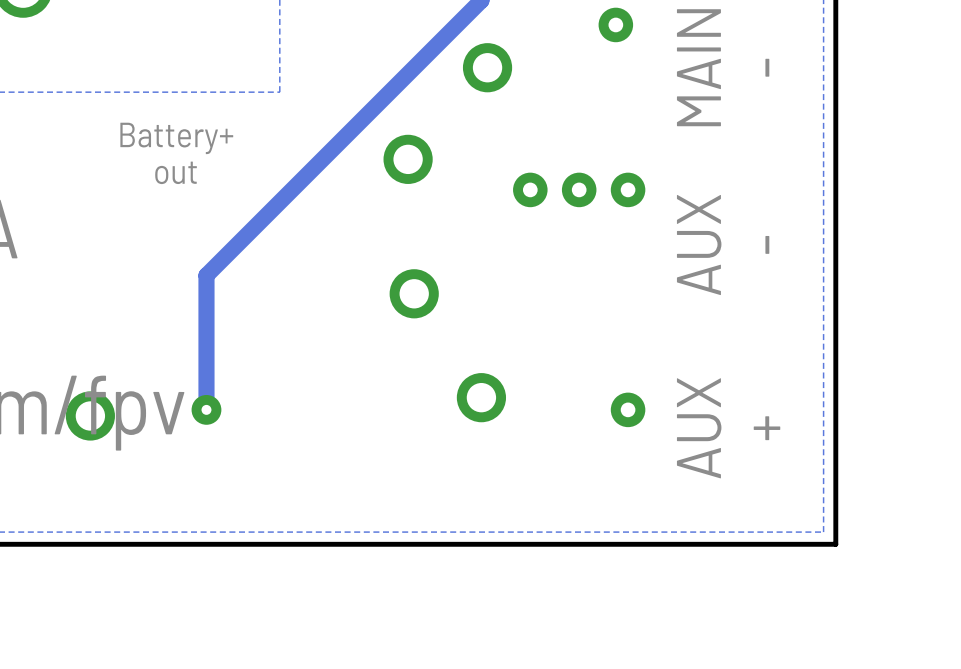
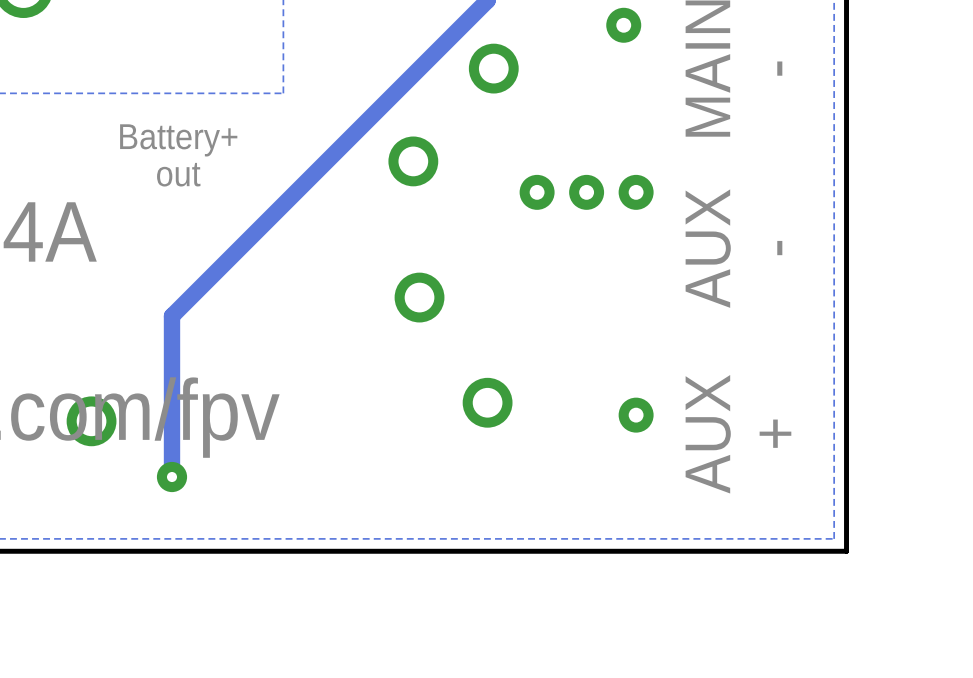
track: (206, 275) (206, 409) -> (209, 278) (171, 316) (171, 477)
via position: (206, 409) -> (171, 477)

